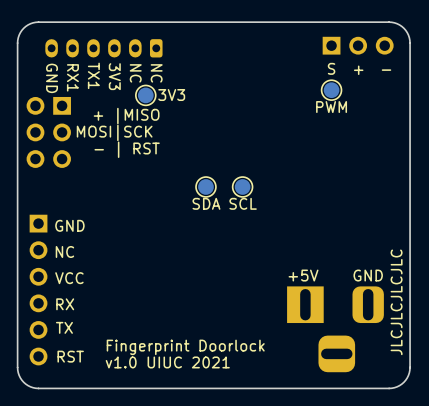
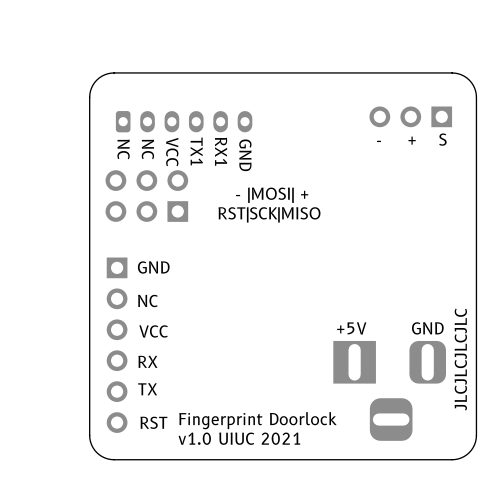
part rotation: 0° (358, 45) -> 180° (410, 116)
part position: (358, 45) -> (410, 116)
part rotation: 0° (103, 48) -> 180° (184, 121)
part position: (103, 48) -> (184, 121)
text position: S (331, 68) -> S (442, 139)
text position: + (358, 70) -> + (412, 140)
text position: - (386, 70) -> - (378, 141)
text: NC (135, 73) -> none
text: NC (156, 73) -> none
text position: TX1 (93, 75) -> TX1 (196, 151)
text: 3V3 (114, 76) -> none
text position: RX1 (72, 77) -> RX1 (221, 151)
board edge: (410, 77) (409, 37) (403, 28) (391, 22) (38, 22) (30, 23) (23, 28) (19, 35) (17, 43) (18, 372) (23, 382) (35, 388) (98, 388) -> (476, 97) (474, 88) (469, 80) (461, 74) (452, 72) (114, 72) (104, 74) (96, 80) (91, 88) (89, 97) (89, 435) (91, 444) (96, 452) (104, 457) (114, 459)
text: GND (52, 78) -> none
PWM: (331, 90) -> none
3V3: (145, 95) -> none
text: + |MISO (126, 116) -> none
text: none -> NC (123, 149)
text: none -> NC (147, 149)
text: none -> VCC (172, 152)
text: none -> GND (245, 155)
part rotation: 0° (48, 132) -> 90° clockwise (146, 196)
part position: (48, 132) -> (146, 196)
text: MOSI|SCK (114, 132) -> none
text: - | RST (127, 149) -> none
text: none -> - |MOSI| + (272, 195)
text: none -> RST|SCK|MISO (269, 214)
SDA: (205, 186) -> none
SCL: (242, 186) -> none
text position: GND (69, 225) -> GND (153, 267)
text position: NC (64, 251) -> NC (147, 300)
text position: VCC (69, 278) -> VCC (153, 331)
part position: (38, 290) -> (117, 345)
text position: RX (65, 304) -> RX (147, 361)
text position: TX (64, 327) -> TX (147, 389)
text position: Fingerprint Doorlock (185, 347) -> Fingerprint Doorlock (257, 420)
text position: RST (70, 356) -> RST (153, 422)
text position: v1.0 UIUC 2021 (167, 362) -> v1.0 UIUC 2021 (239, 438)

